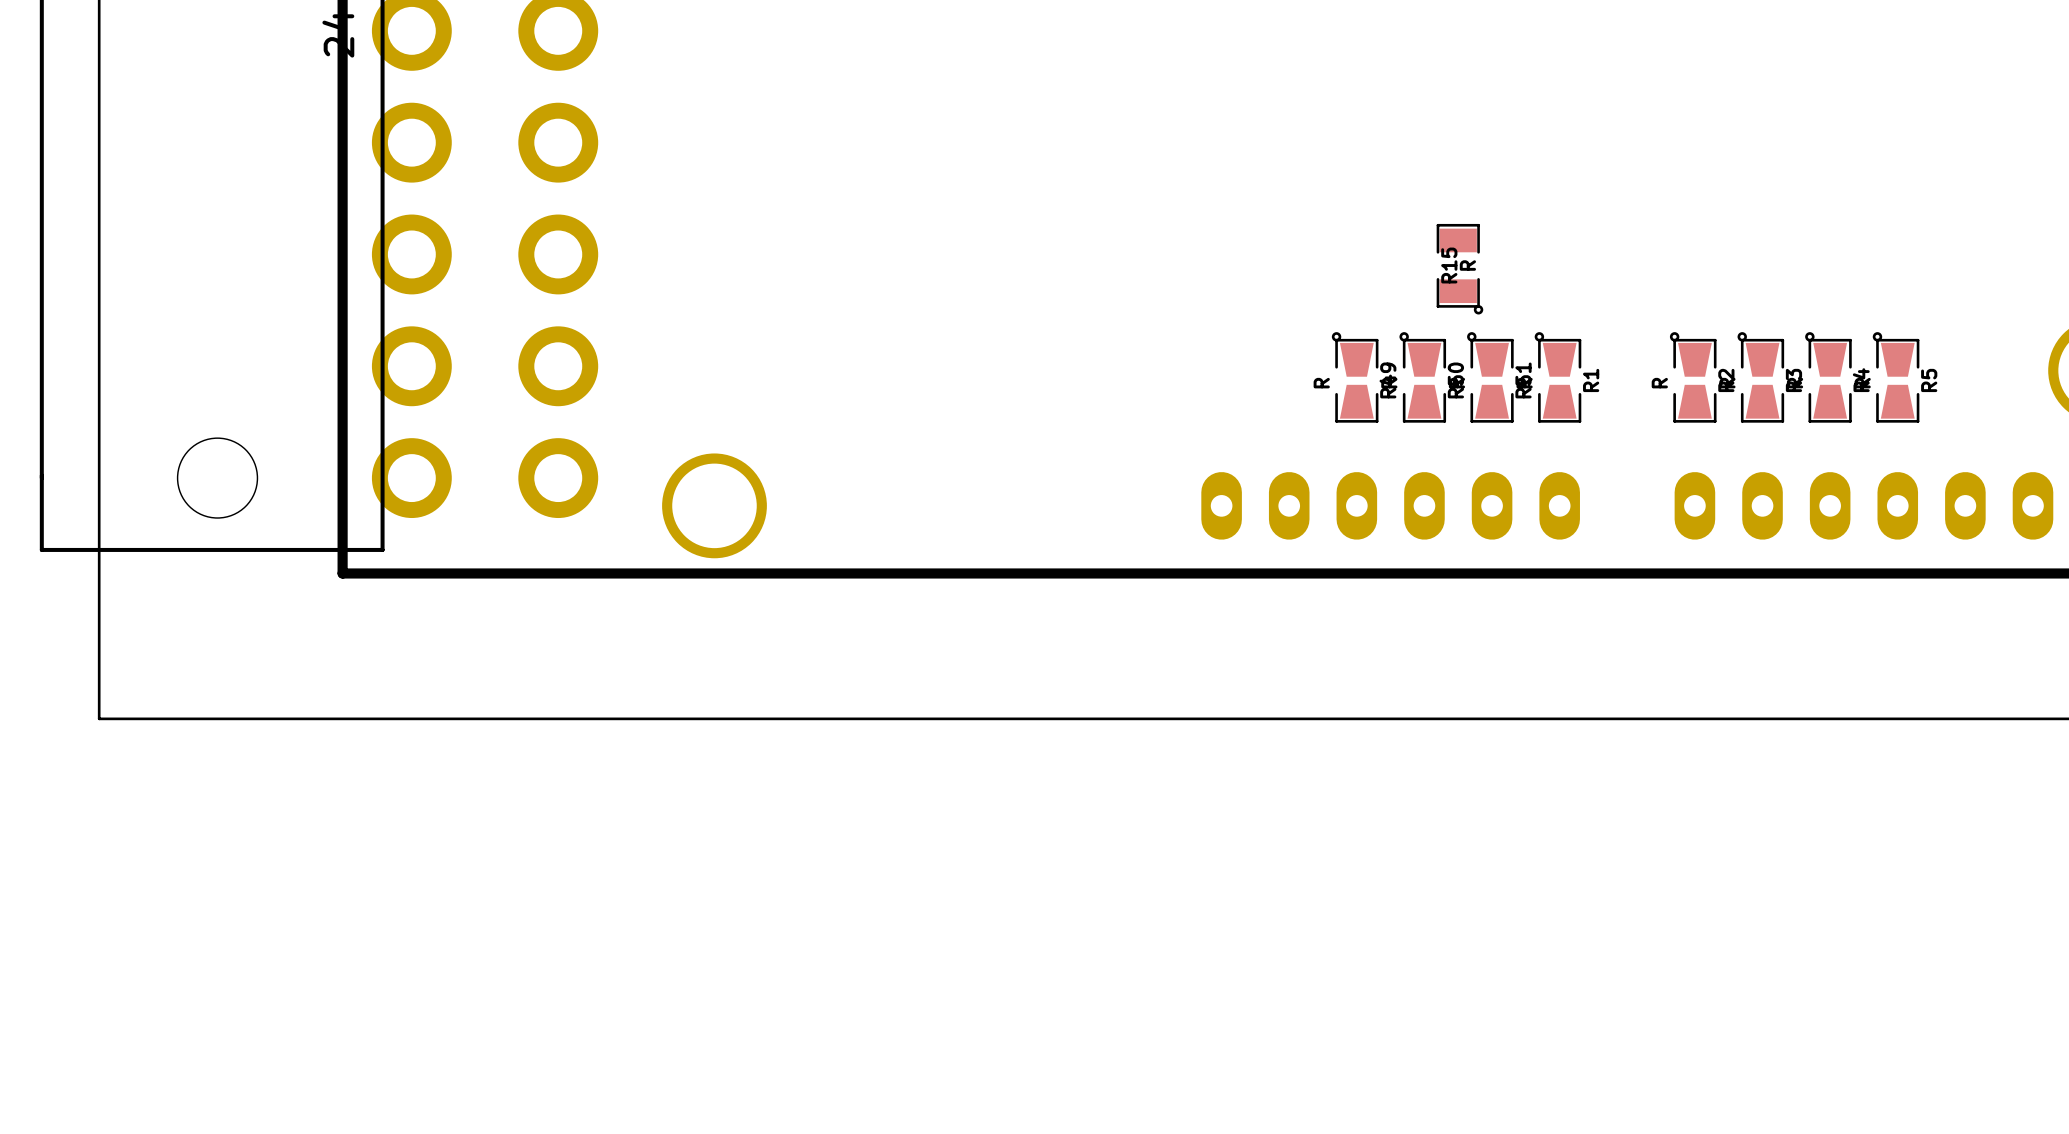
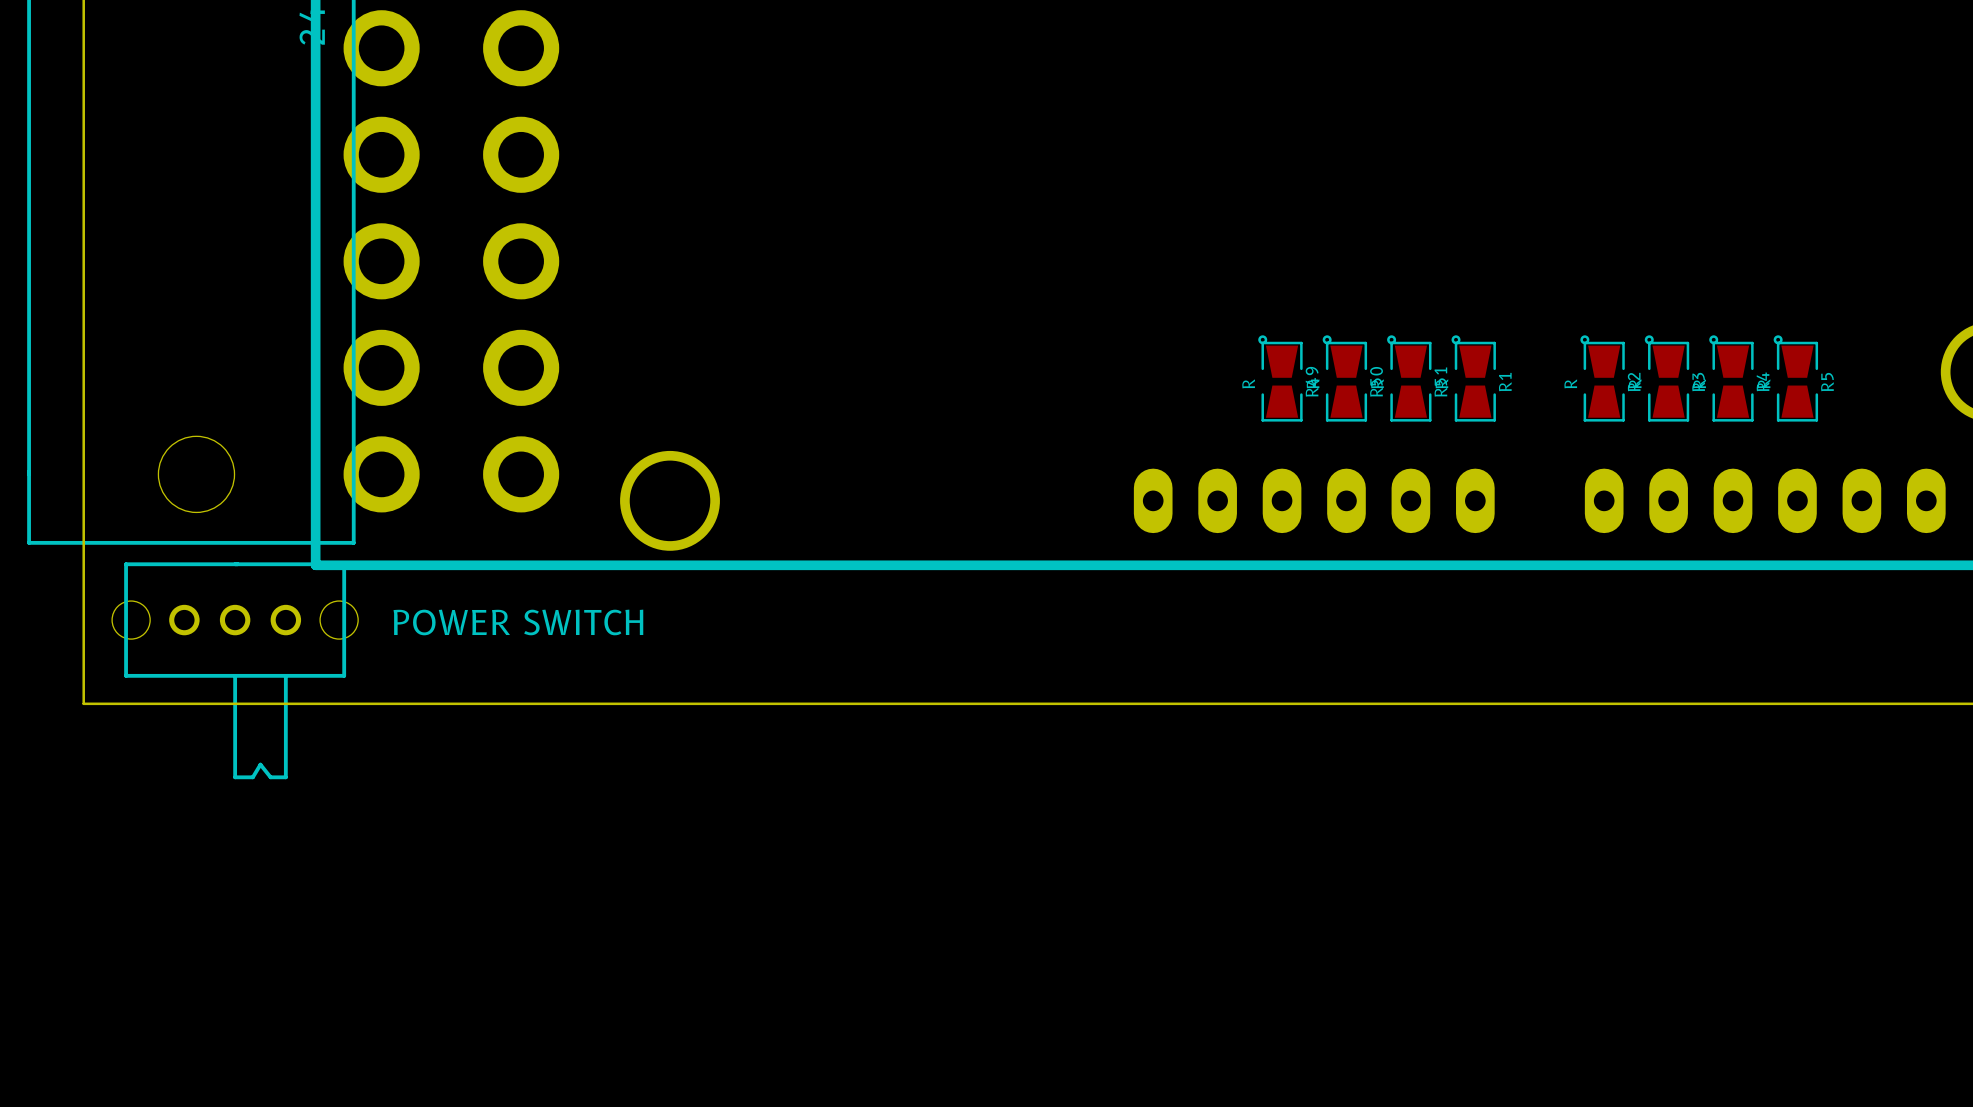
R15: R (1459, 269) -> none
part: none -> POWER SWITCH (235, 670)

